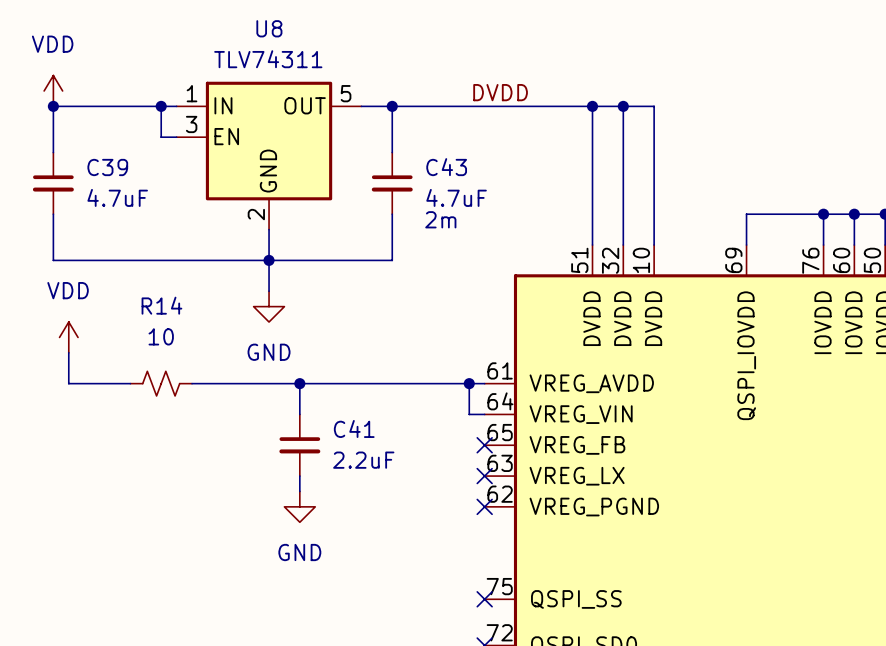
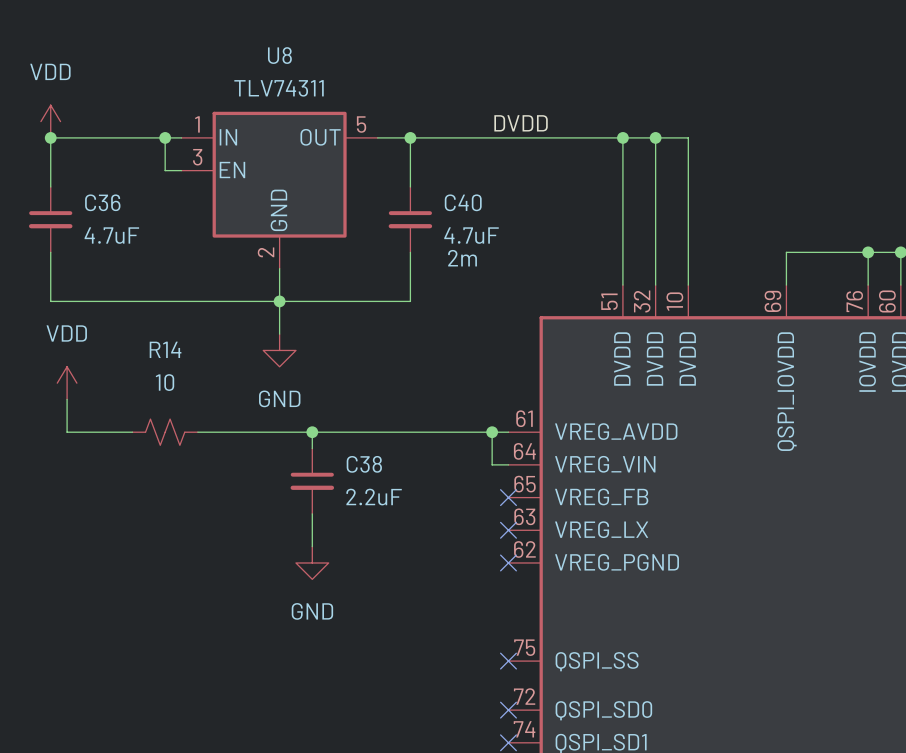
C39 name: C39 (107, 167) -> C36 (102, 202)
C43 name: C43 (446, 167) -> C40 (463, 202)
C38: none -> 2.2uF (312, 481)
C41: 2.2uF (299, 445) -> none

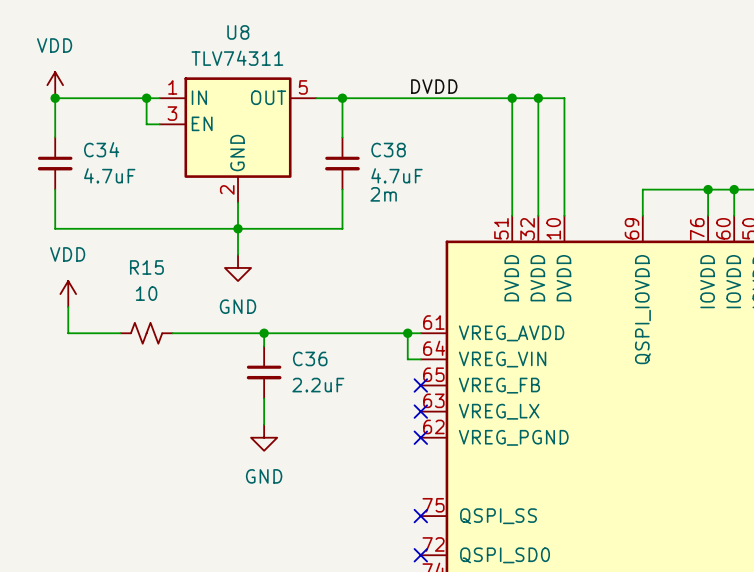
C36 name: C36 (102, 202) -> C34 (101, 149)
C40 name: C40 (463, 202) -> C38 (388, 150)
R14 name: R14 (165, 349) -> R15 (146, 267)
C38 name: C38 (364, 464) -> C36 (310, 358)

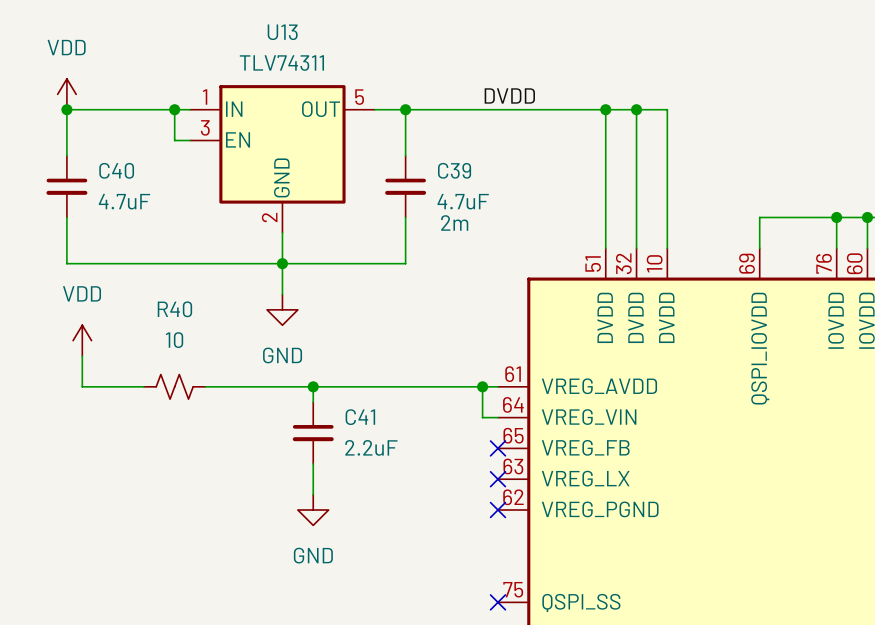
U8 name: U8 (238, 32) -> U13 (282, 32)
C34 name: C34 (101, 149) -> C40 (116, 170)
C38 name: C38 (388, 150) -> C39 (454, 170)
R15 name: R15 (146, 267) -> R40 (174, 309)
C36 name: C36 (310, 358) -> C41 (360, 417)

